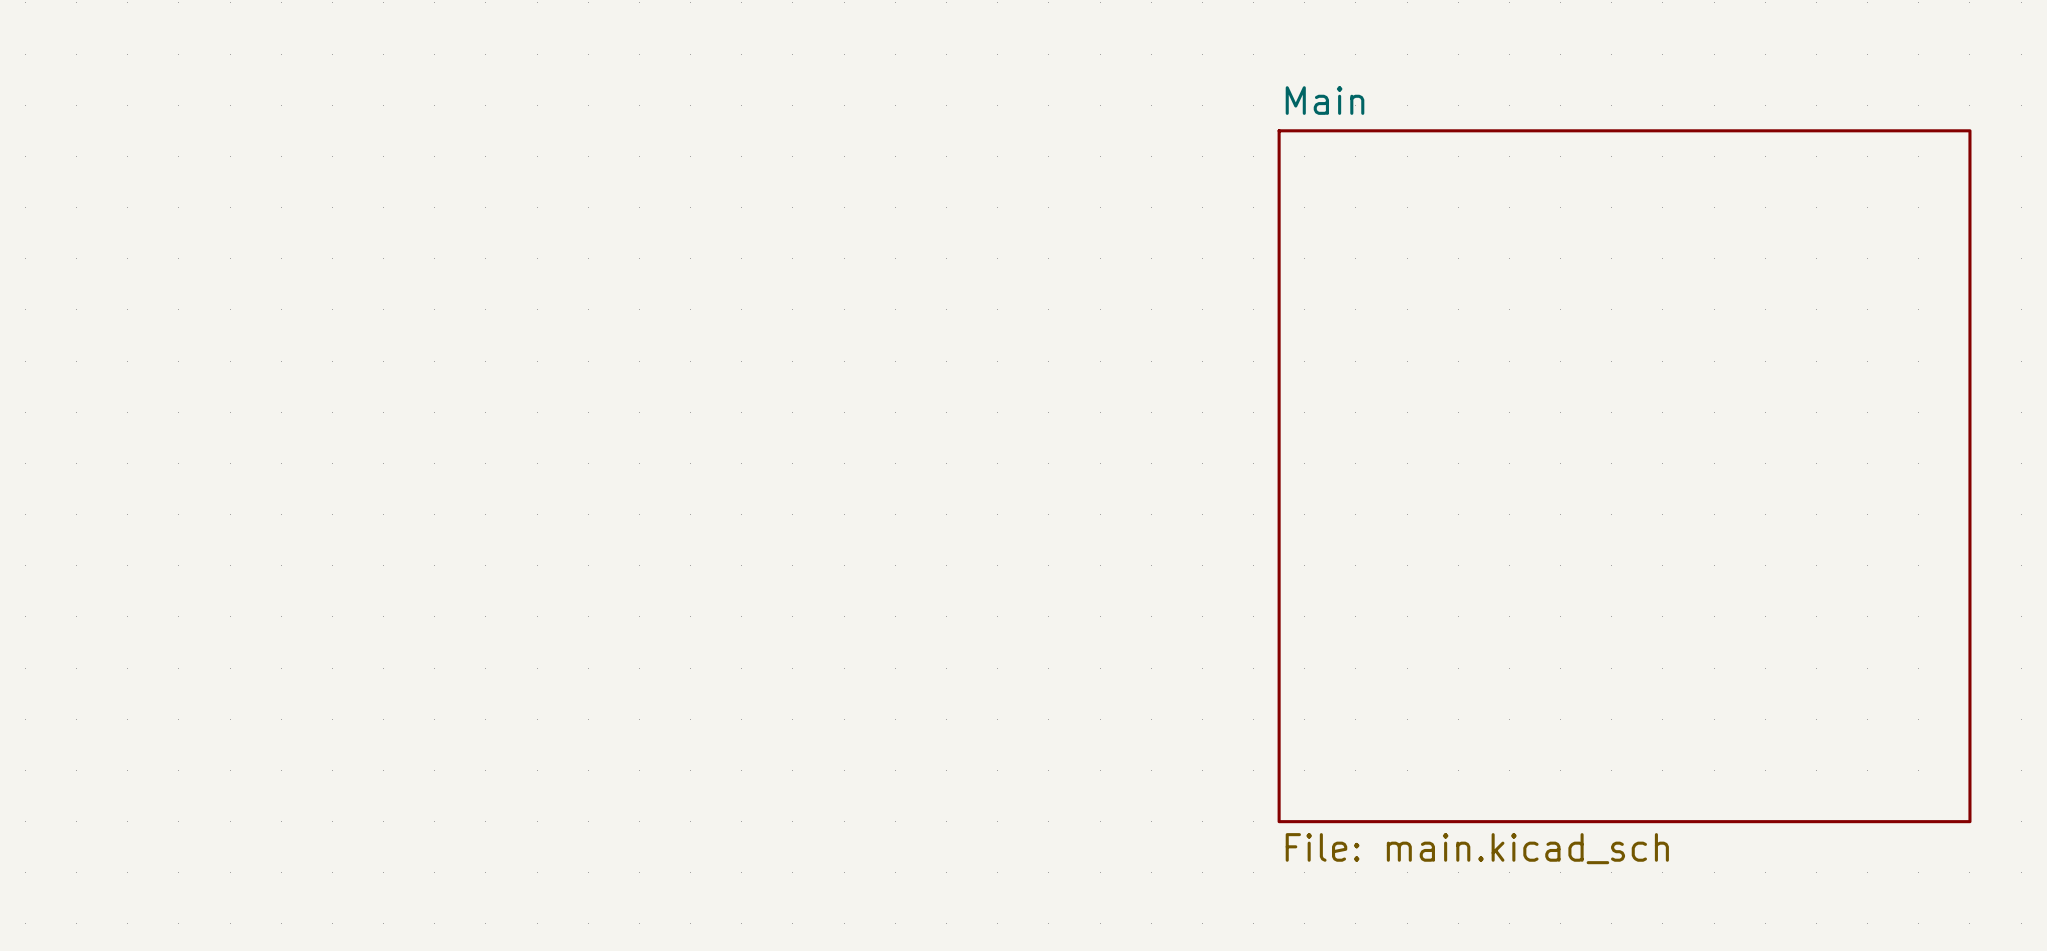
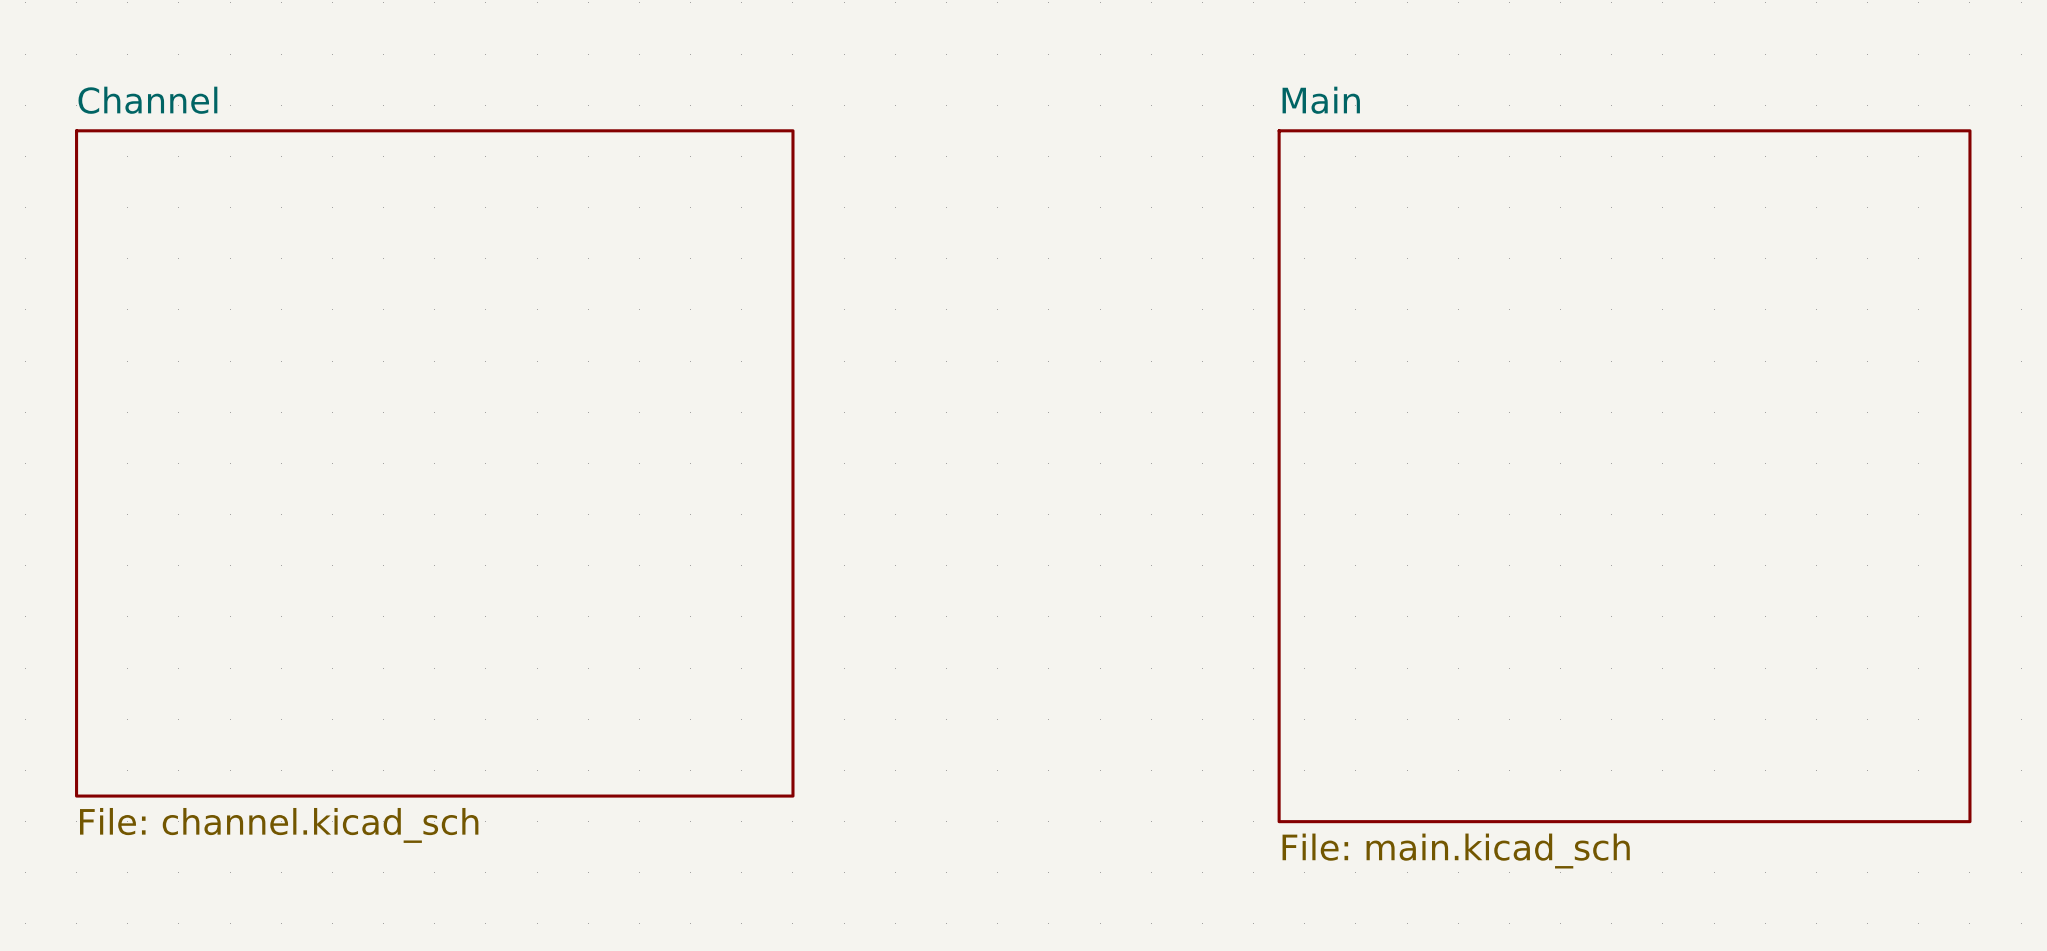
sheet Channel: none -> File: channel.kicad_sch (434, 463)

